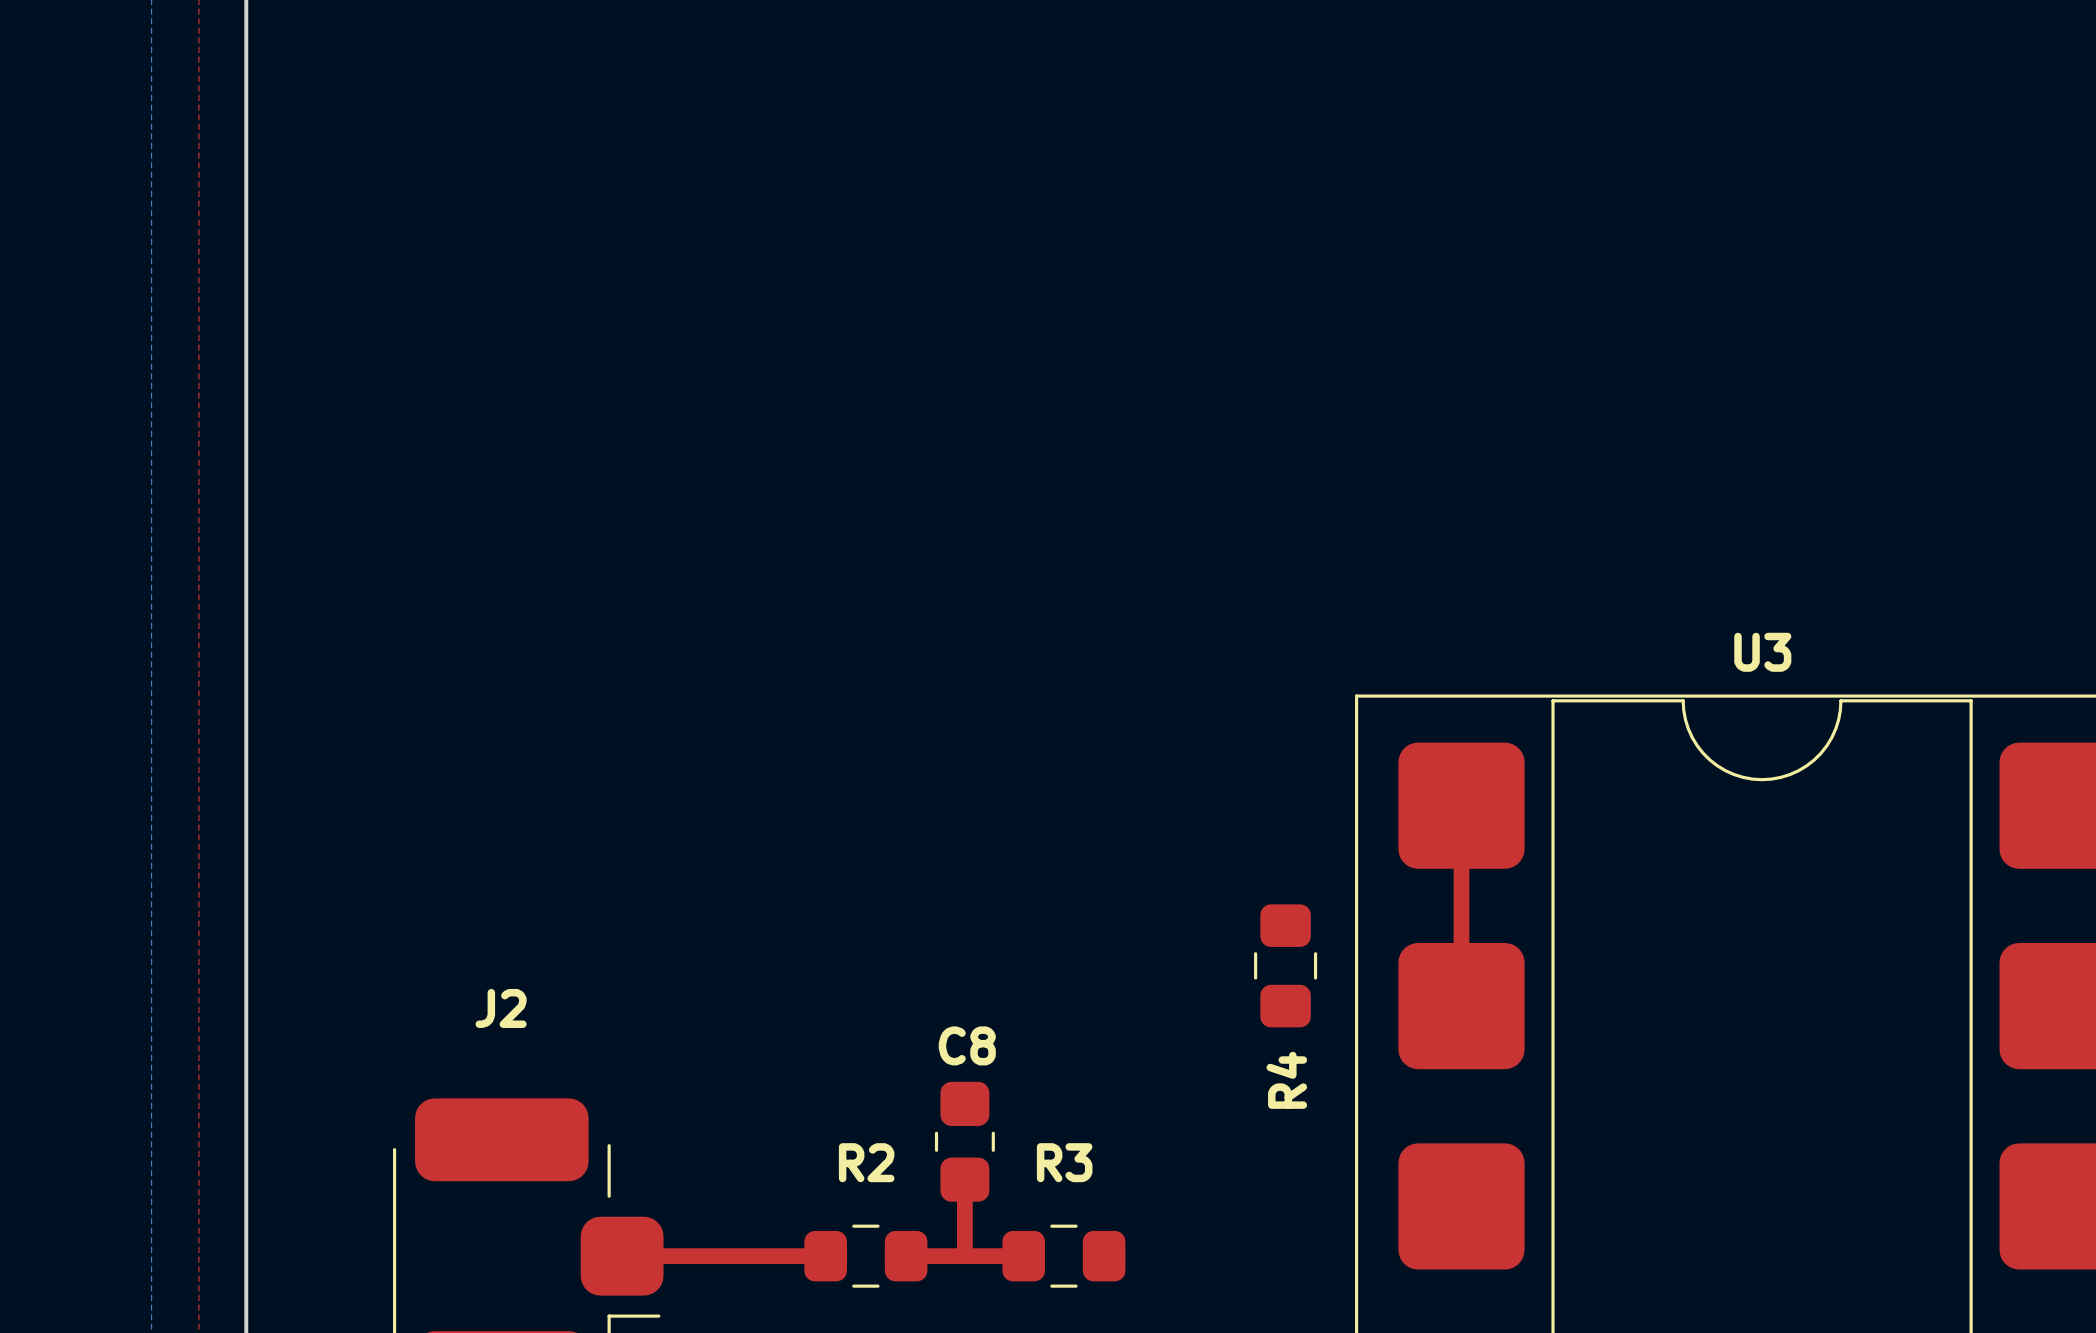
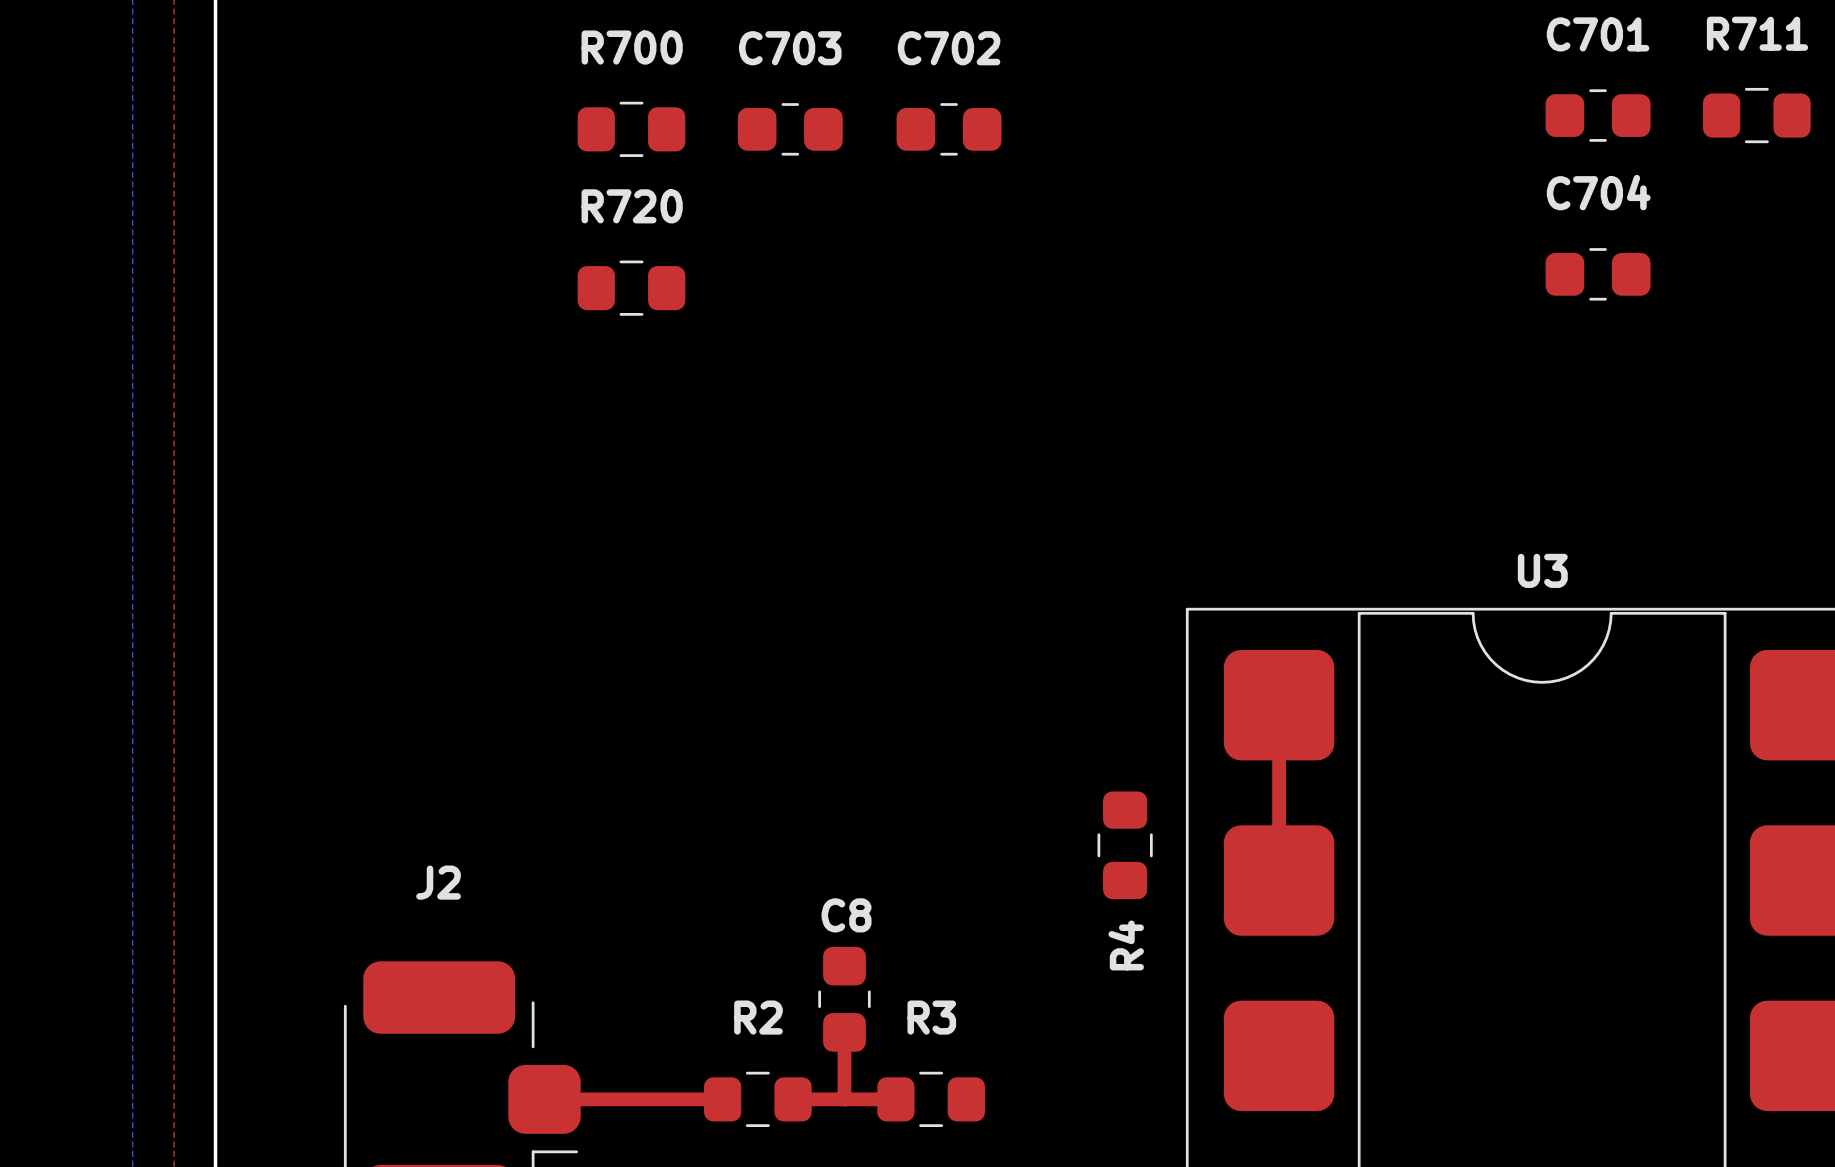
C701: none -> (1598, 115)
R711: none -> (1756, 115)
R700: none -> (631, 129)
C703: none -> (790, 129)
C702: none -> (949, 129)
C704: none -> (1598, 274)
R720: none -> (631, 288)

